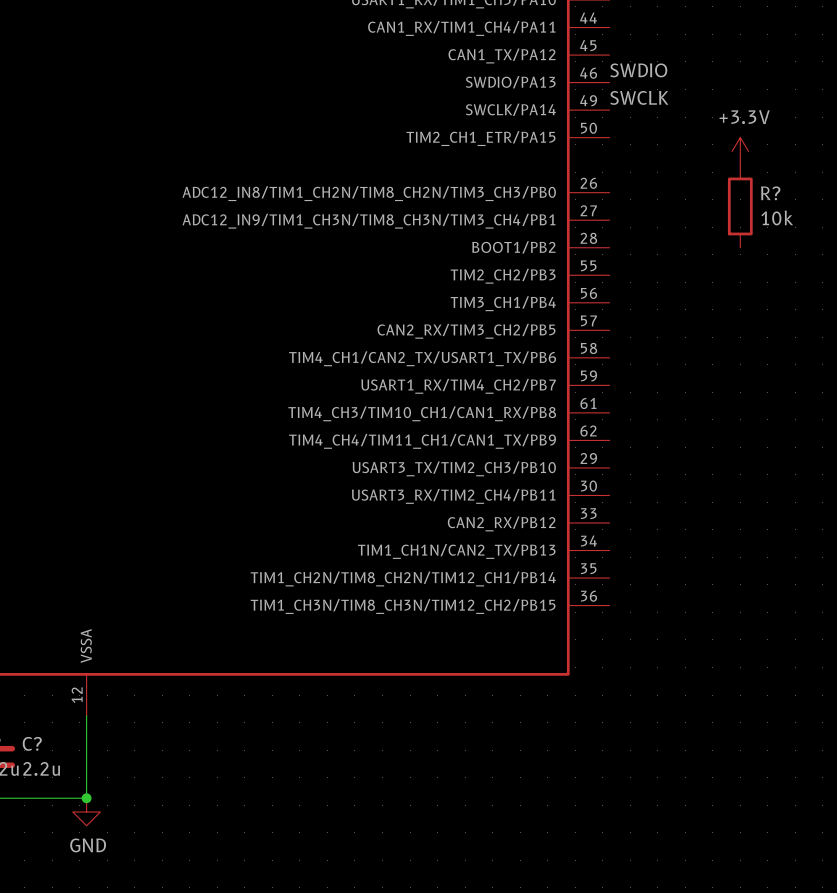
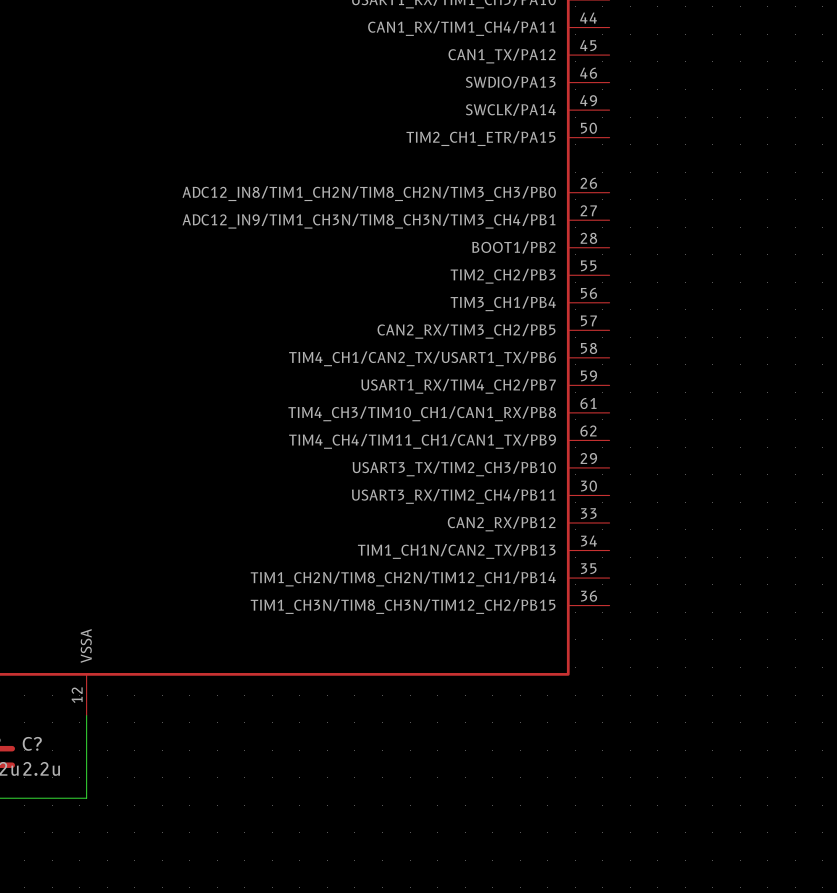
label: SWDIO (638, 70) -> none
label: SWCLK (639, 97) -> none
power symbol: +3.3V (740, 151) -> none
R?: 10k (740, 206) -> none
junction: (86, 798) -> none
power symbol: GND (86, 812) -> none

